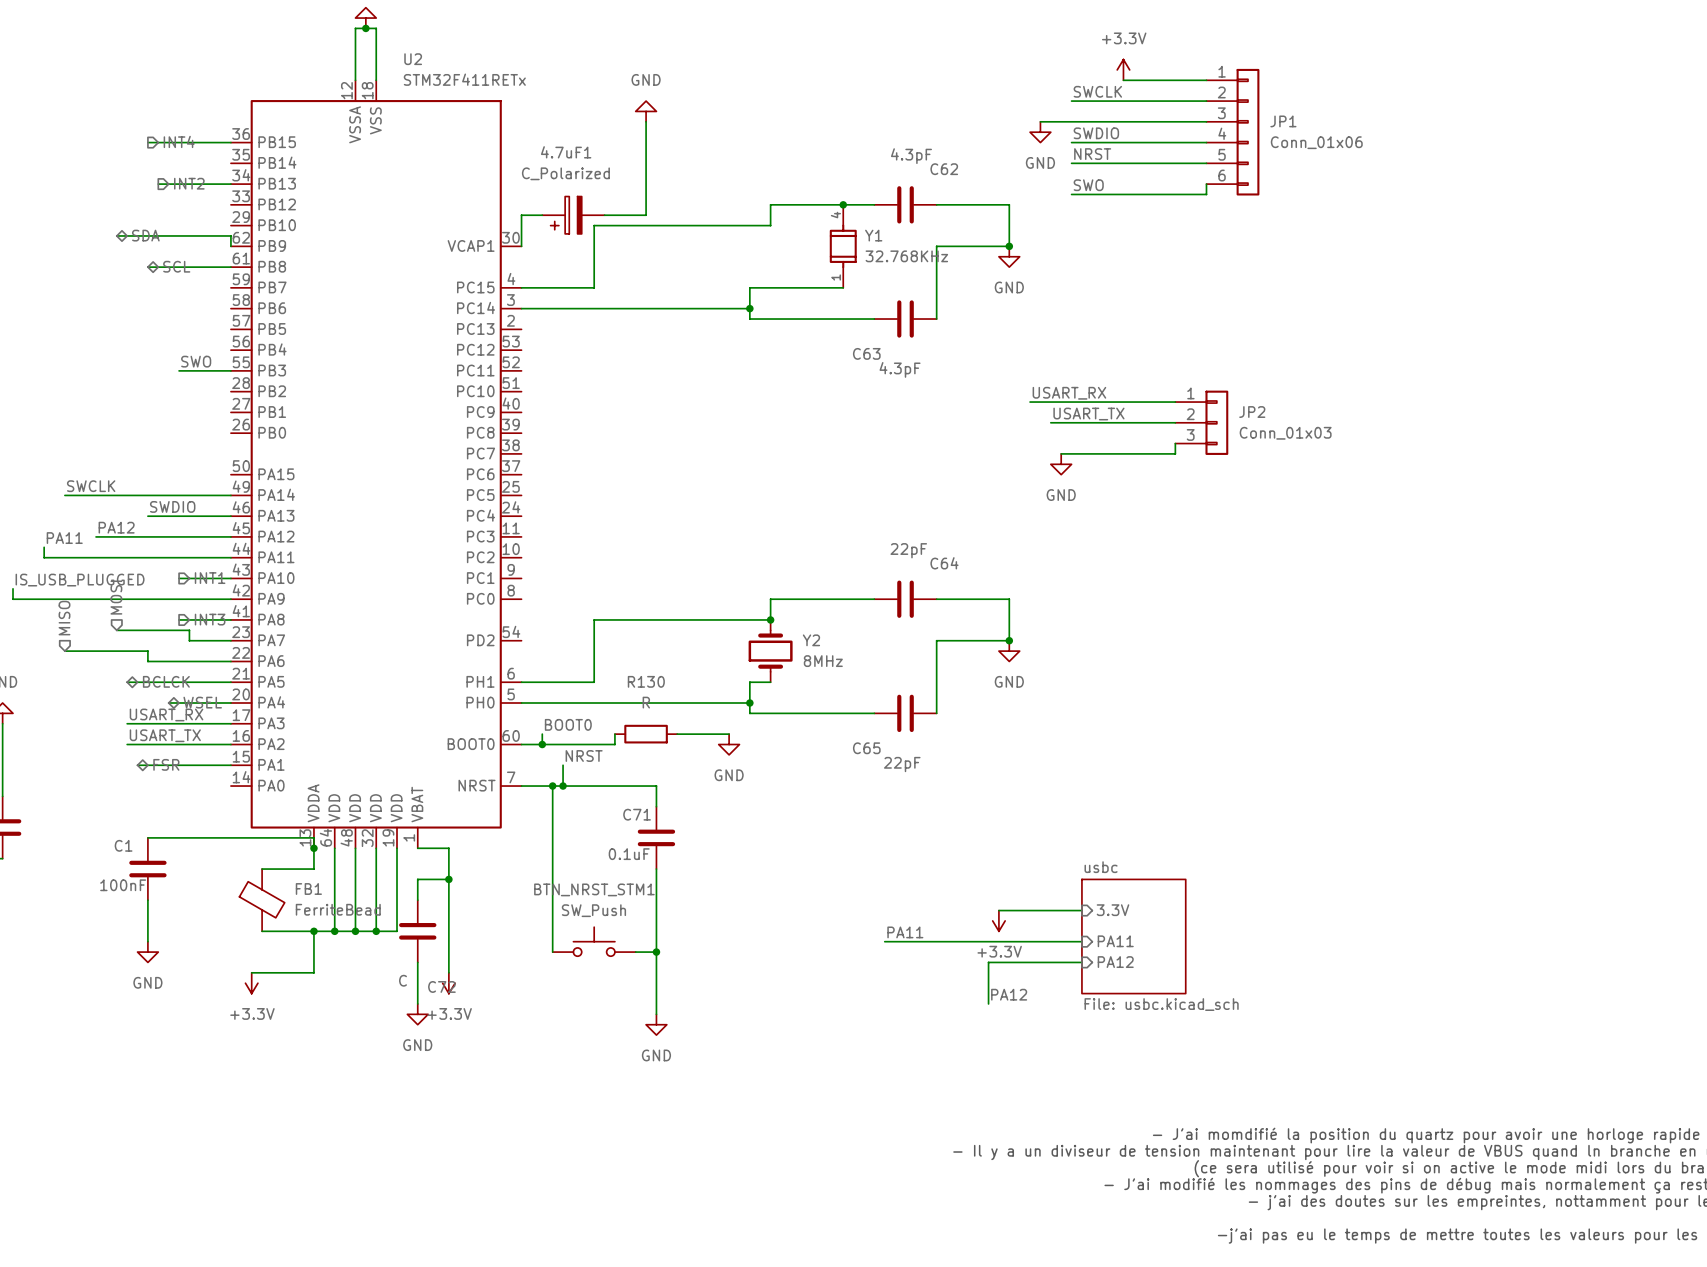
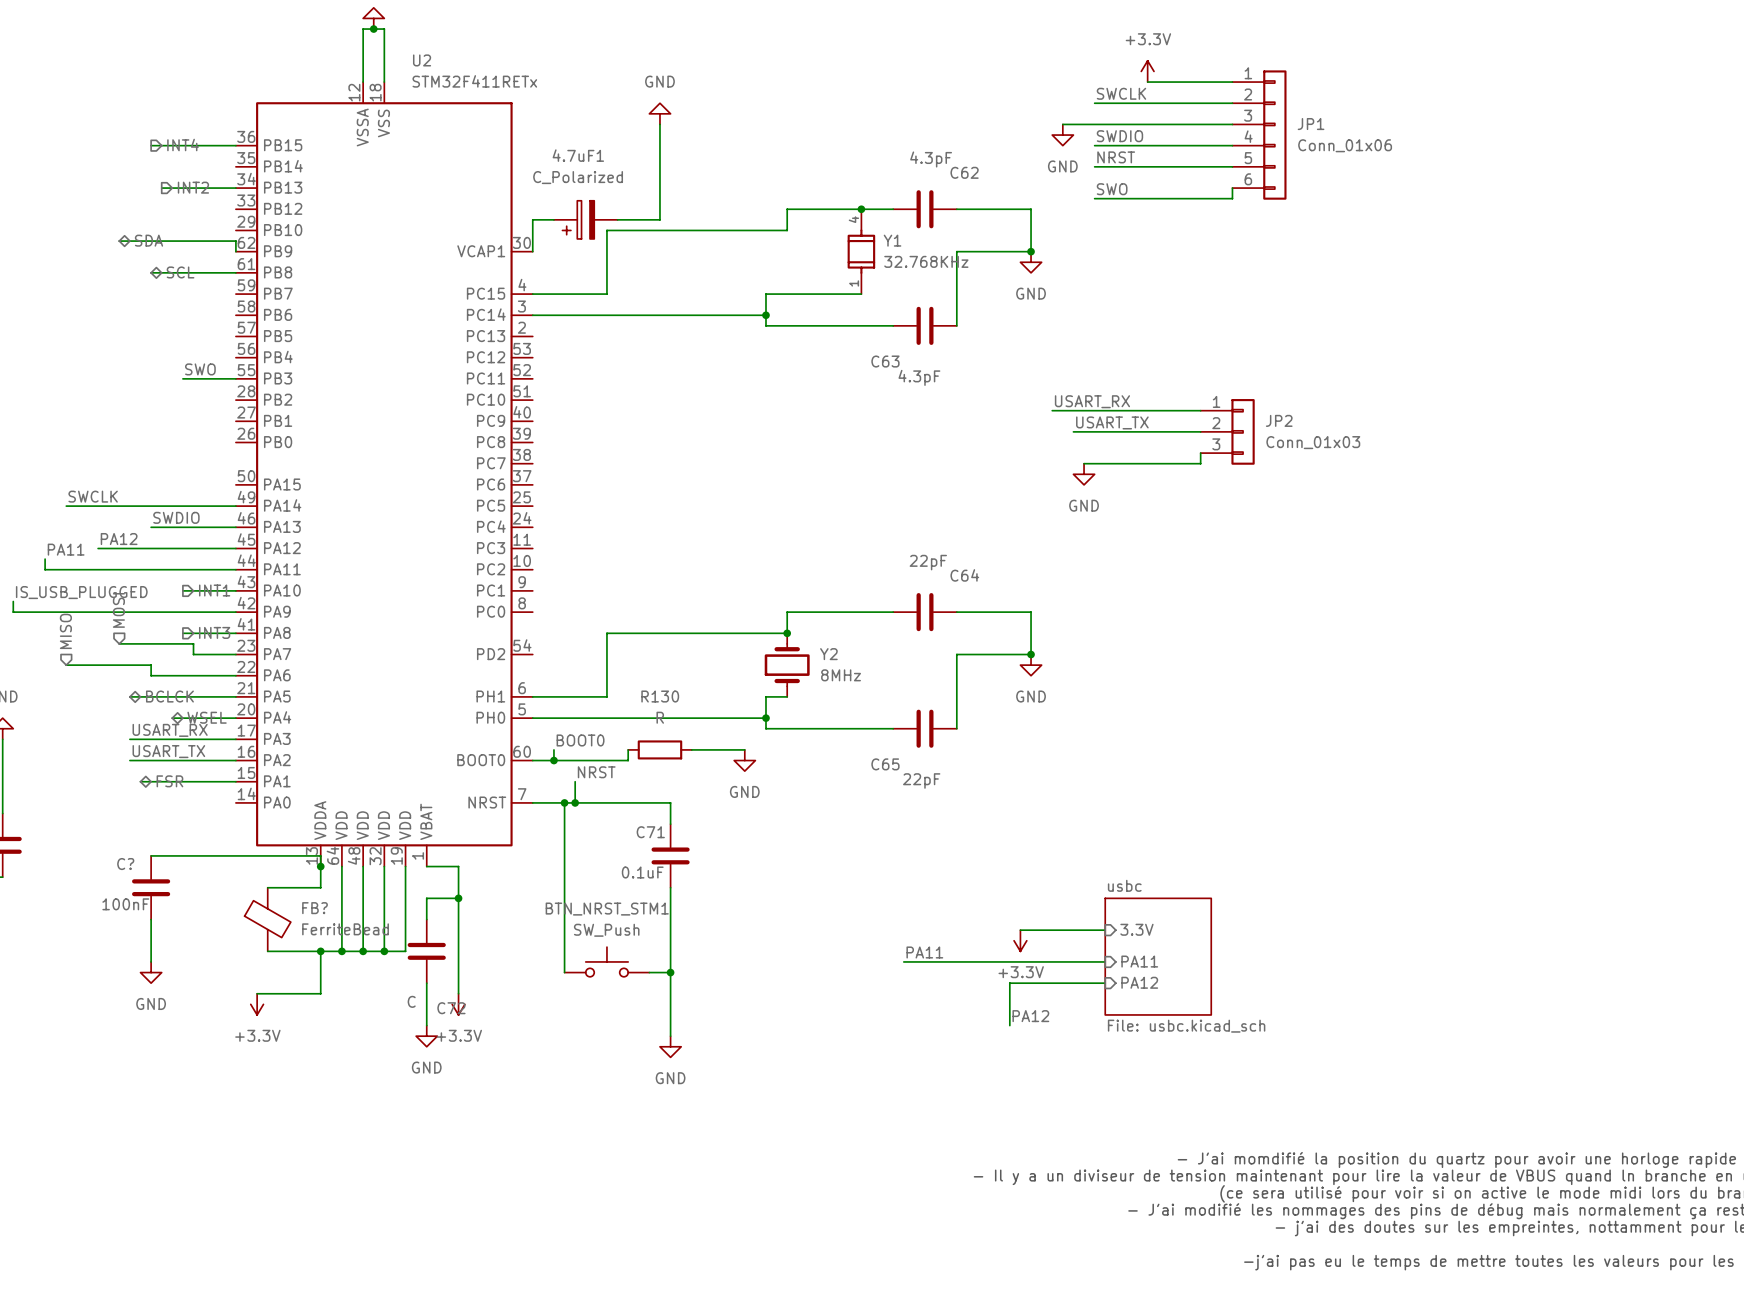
C1 name: C1 (123, 845) -> C? (125, 864)
FB1 name: FB1 (308, 889) -> FB? (315, 908)

